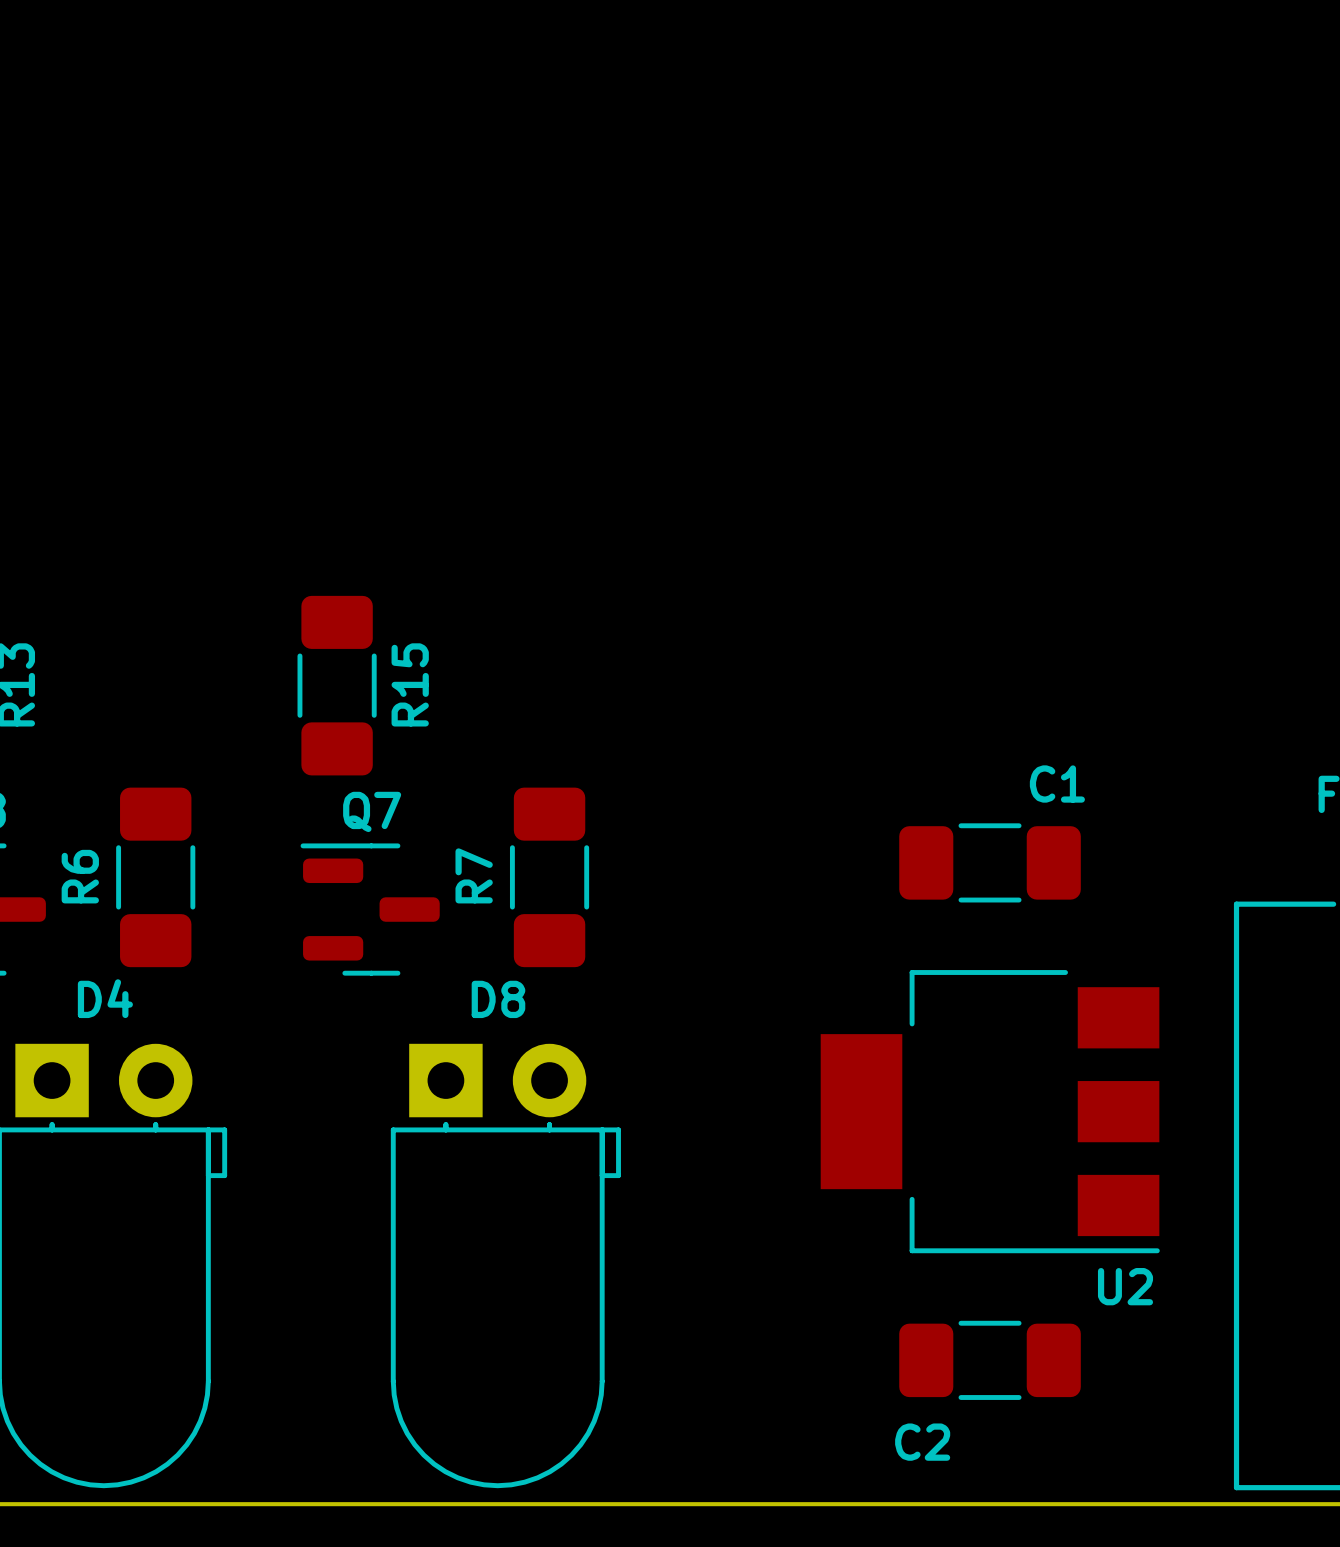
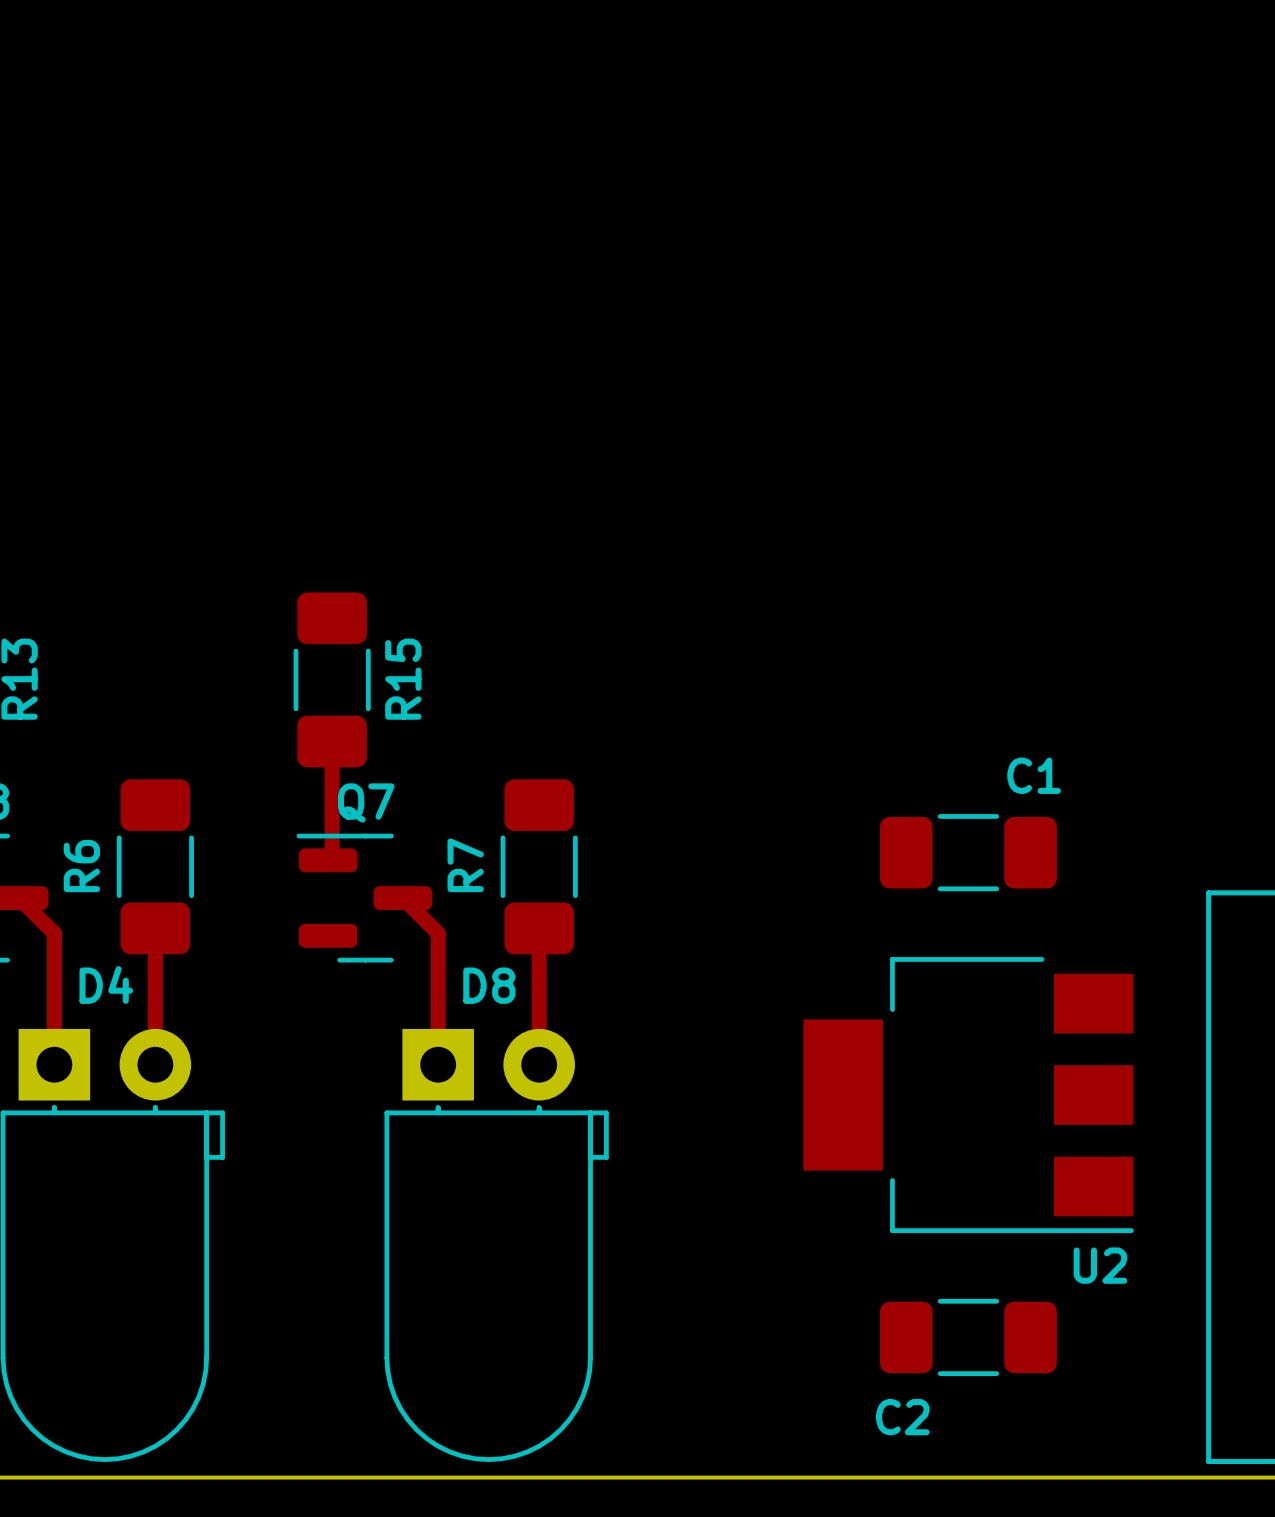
top track: none -> (332, 741) (332, 856) (328, 860)
top track: none -> (19, 898) (54, 933) (54, 1064)
top track: none -> (402, 898) (438, 933) (438, 1064)
top track: none -> (155, 928) (155, 1064)
top track: none -> (539, 928) (539, 1064)

